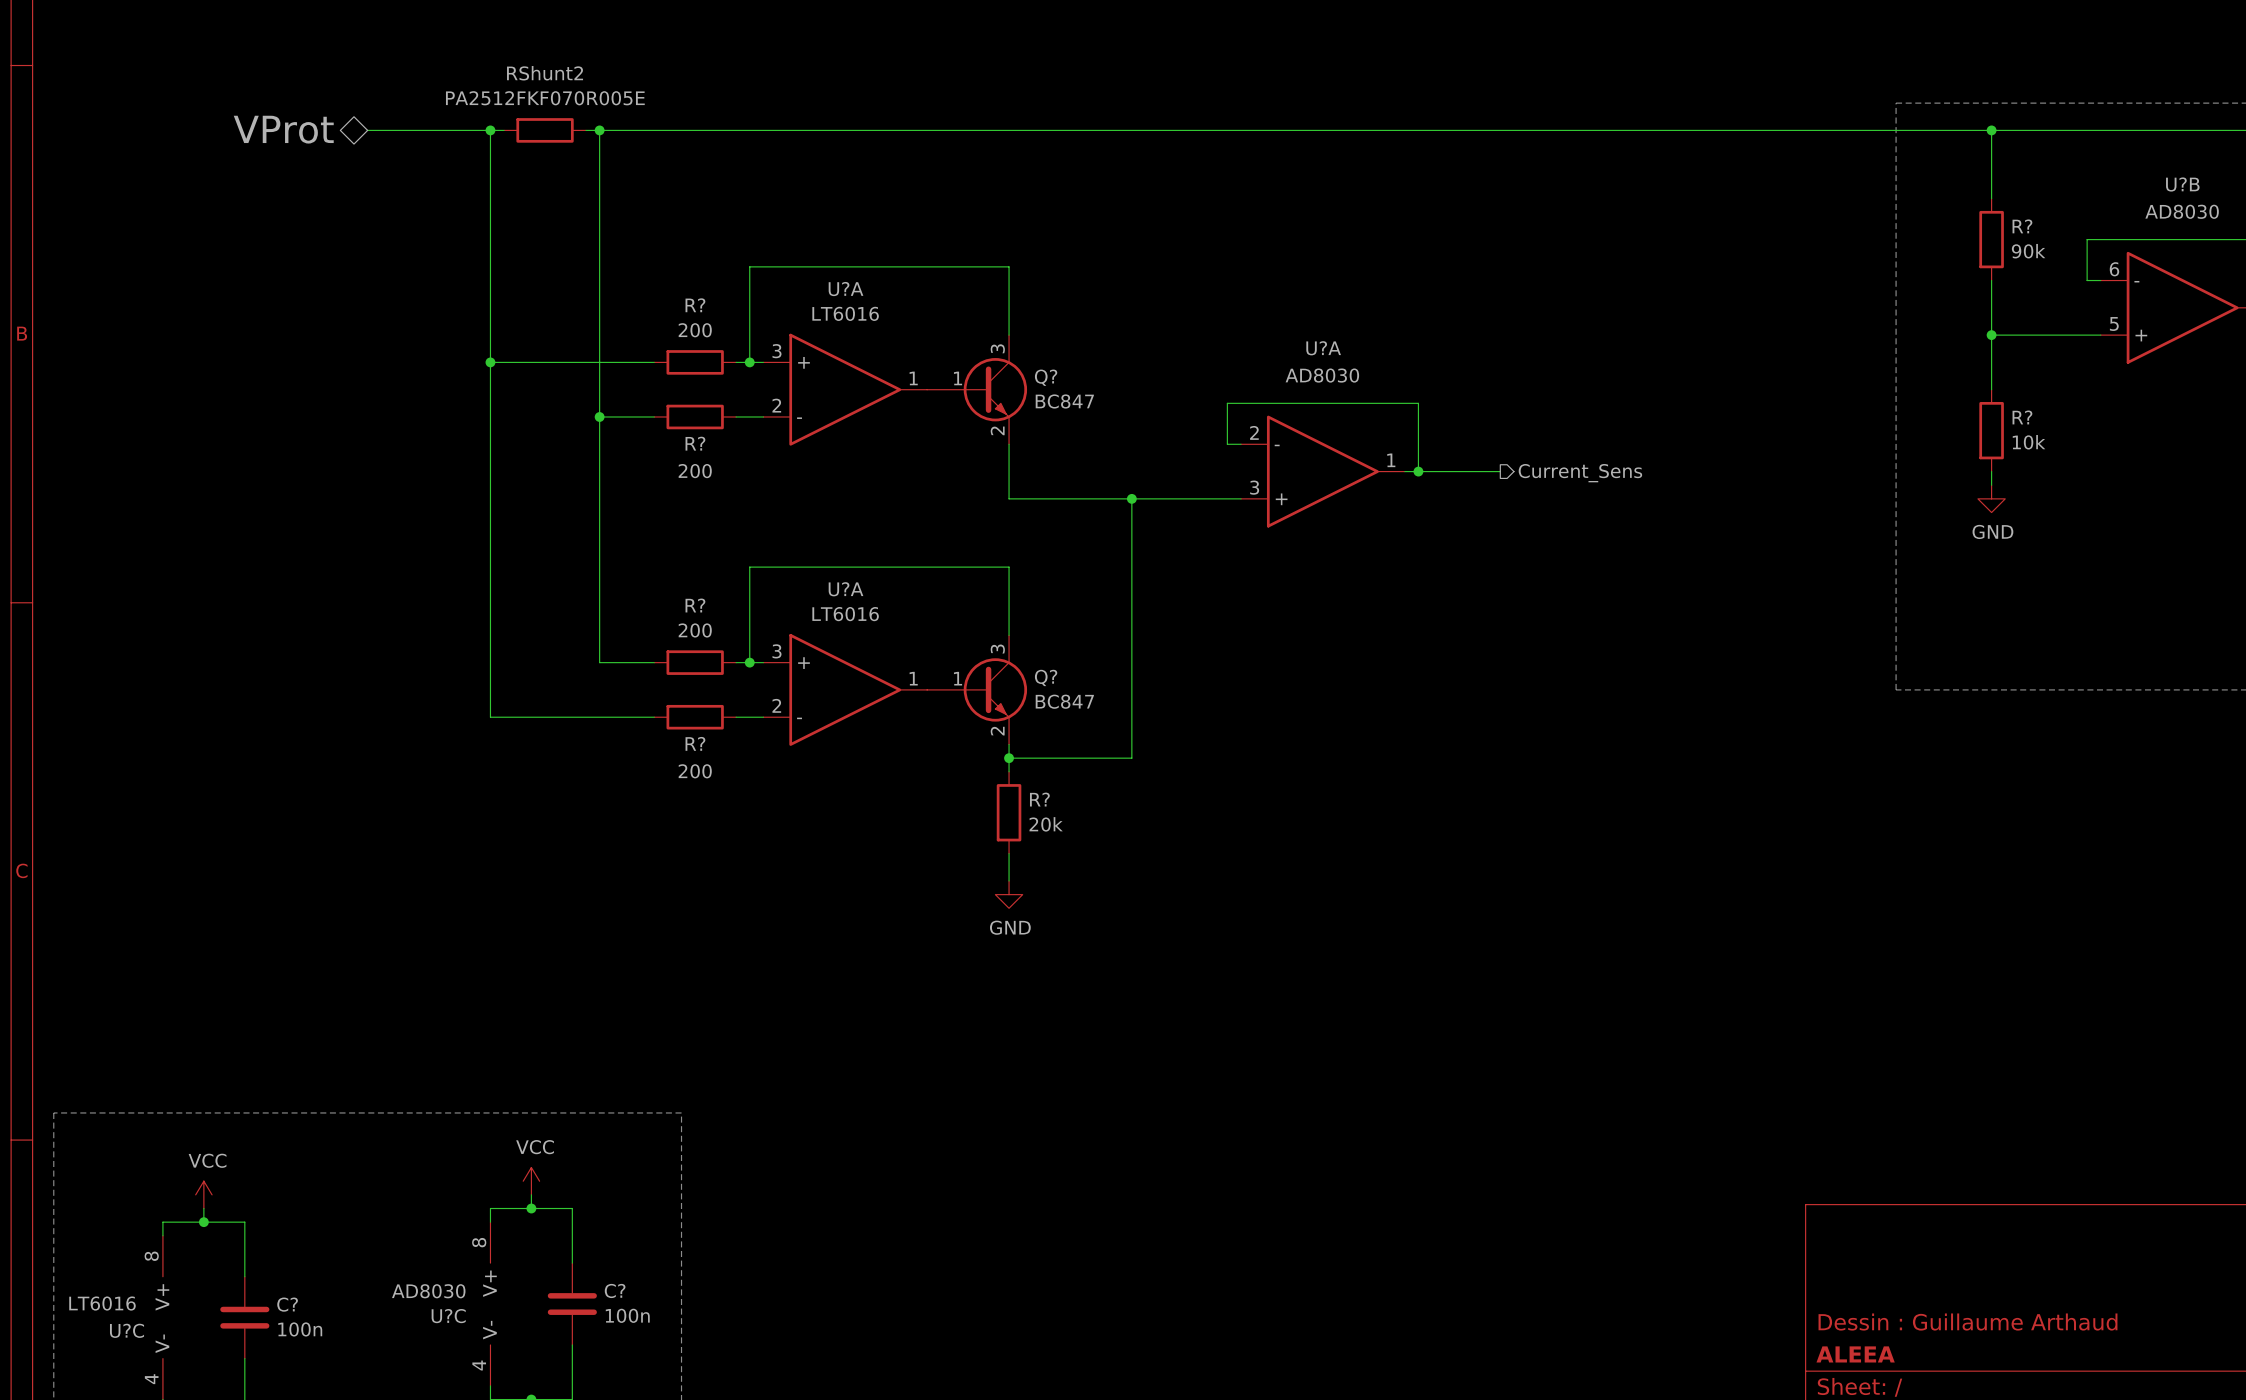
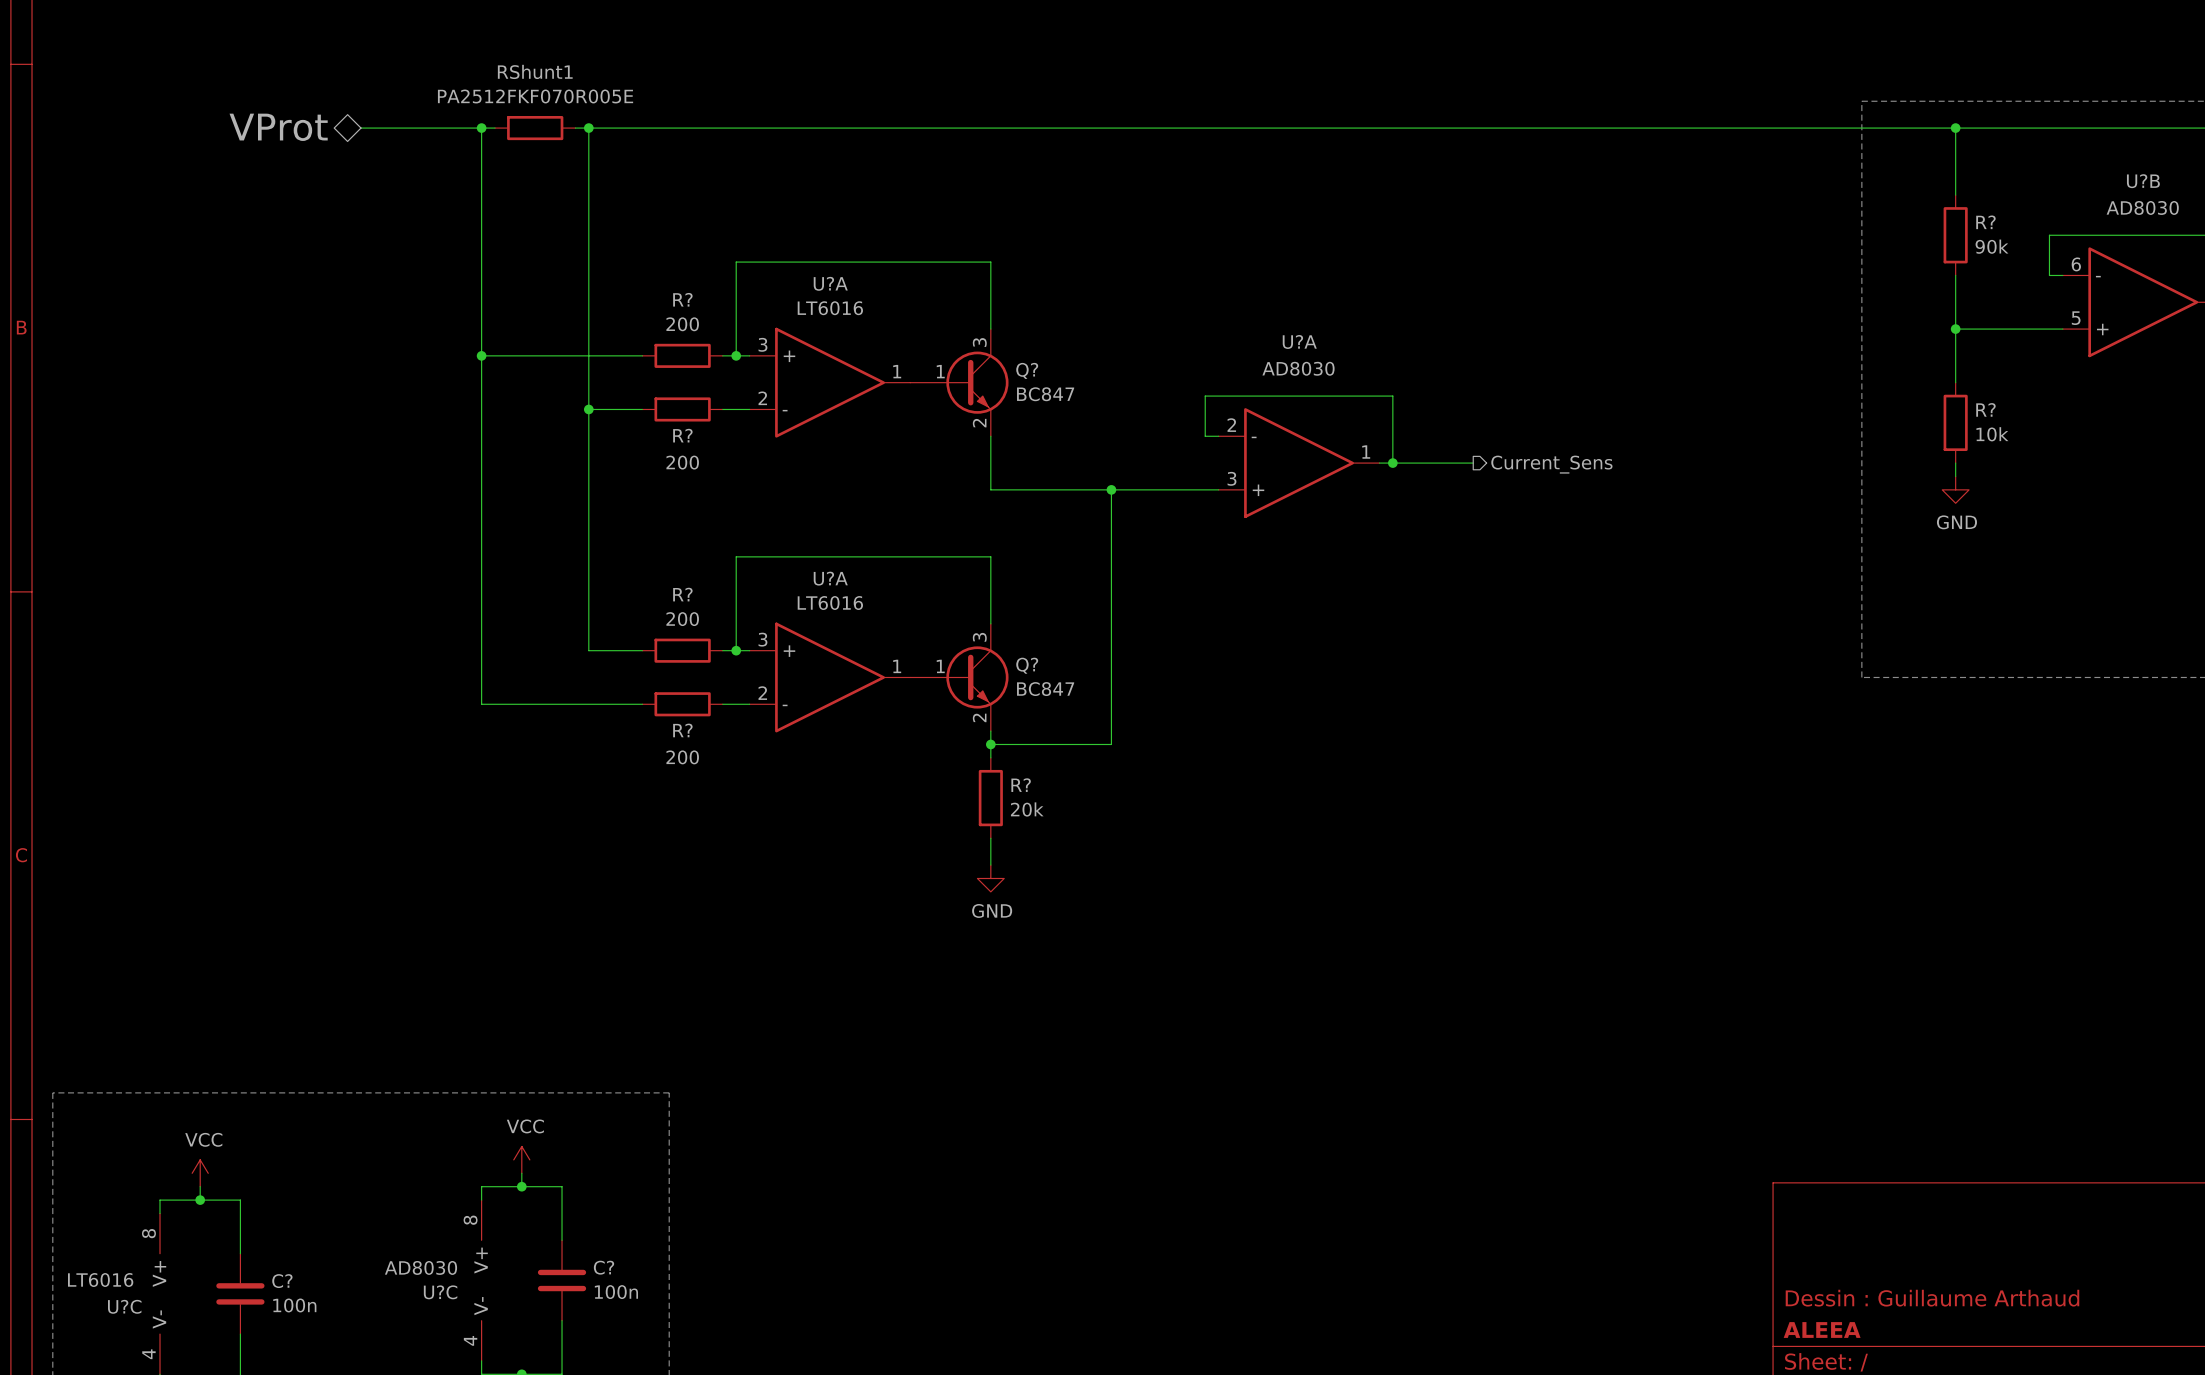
RShunt2 name: RShunt2 (545, 73) -> RShunt1 (535, 71)

